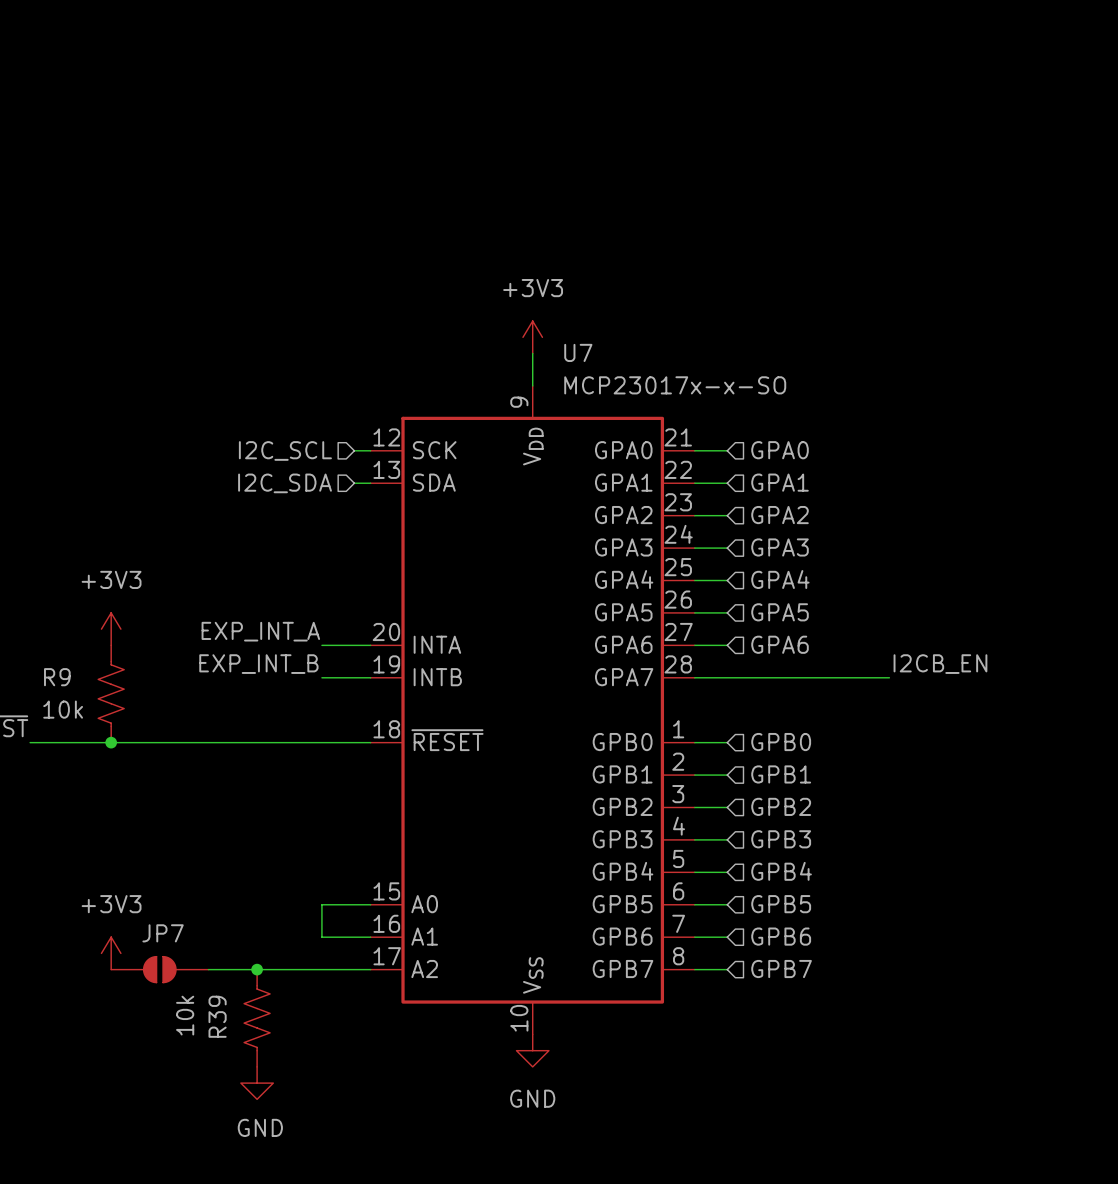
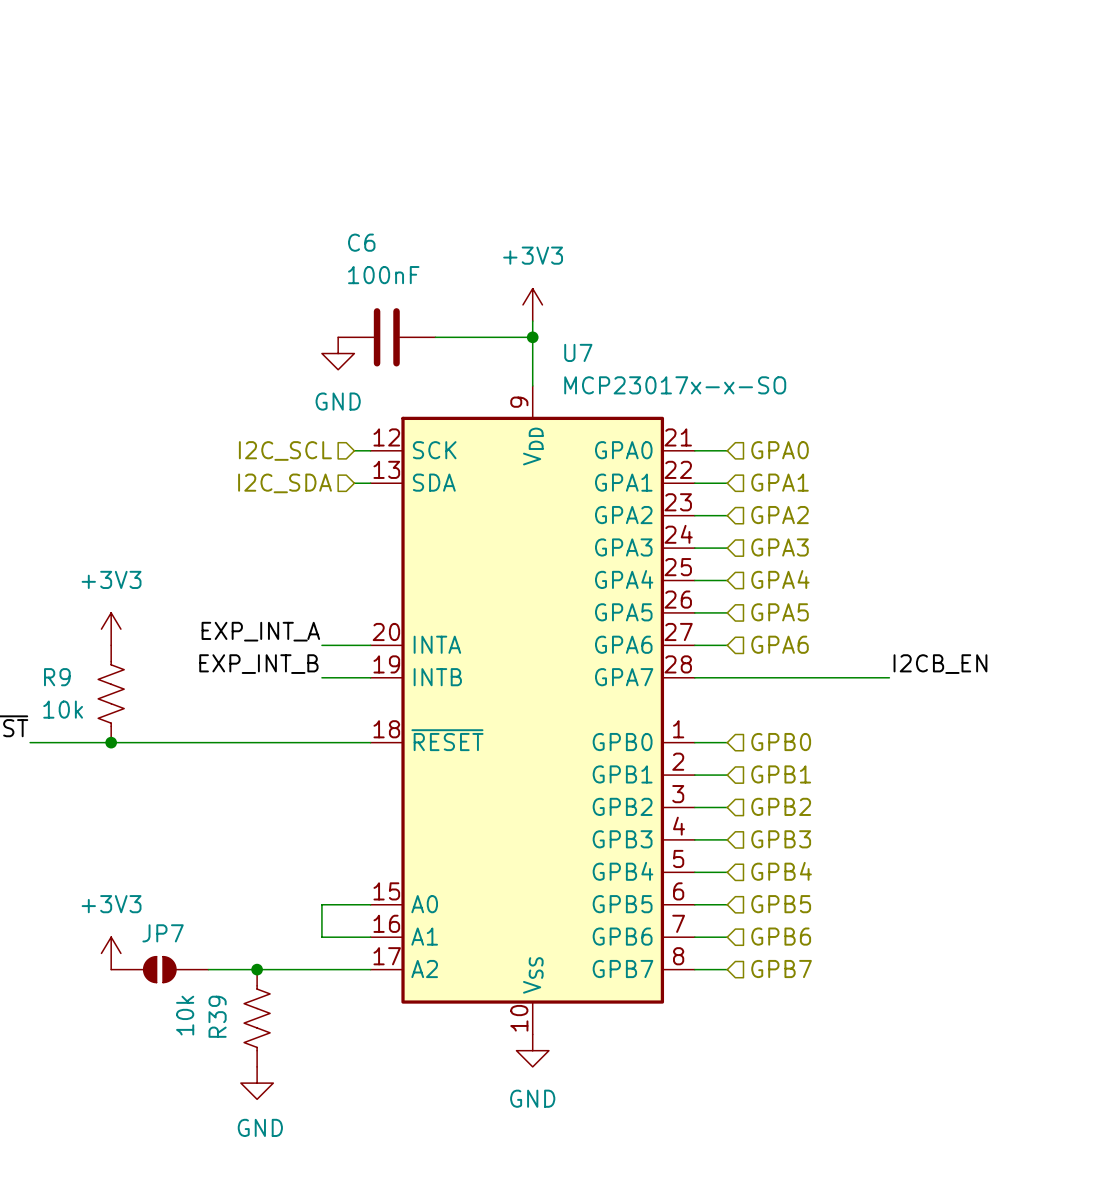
C6: none -> 100nF (386, 337)
wire: none -> (435, 337) (532, 337)
power symbol position: +3V3 (532, 337) -> +3V3 (532, 304)
junction: none -> (532, 337)
power symbol: none -> GND (338, 353)

